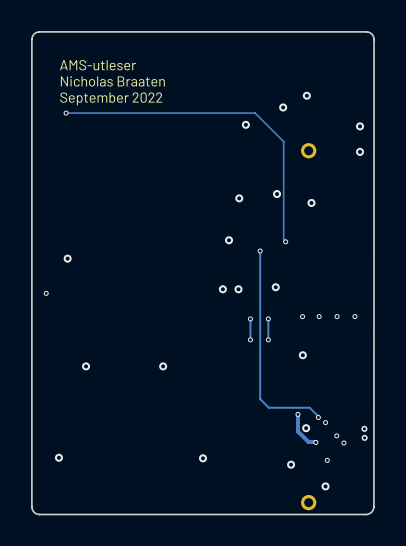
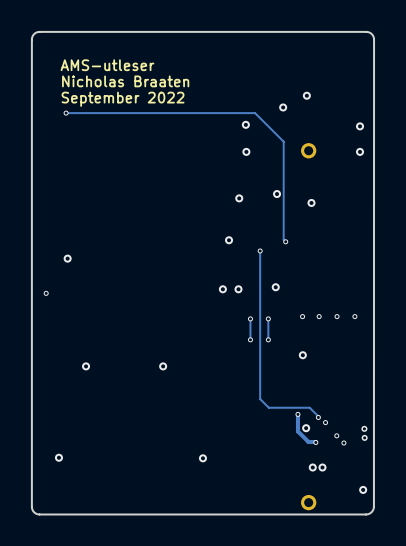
via: none -> (246, 151)
via: (327, 460) -> none
via: (291, 464) -> none
via: none -> (312, 467)
via: none -> (322, 467)
via: (325, 486) -> none
via: none -> (363, 489)

